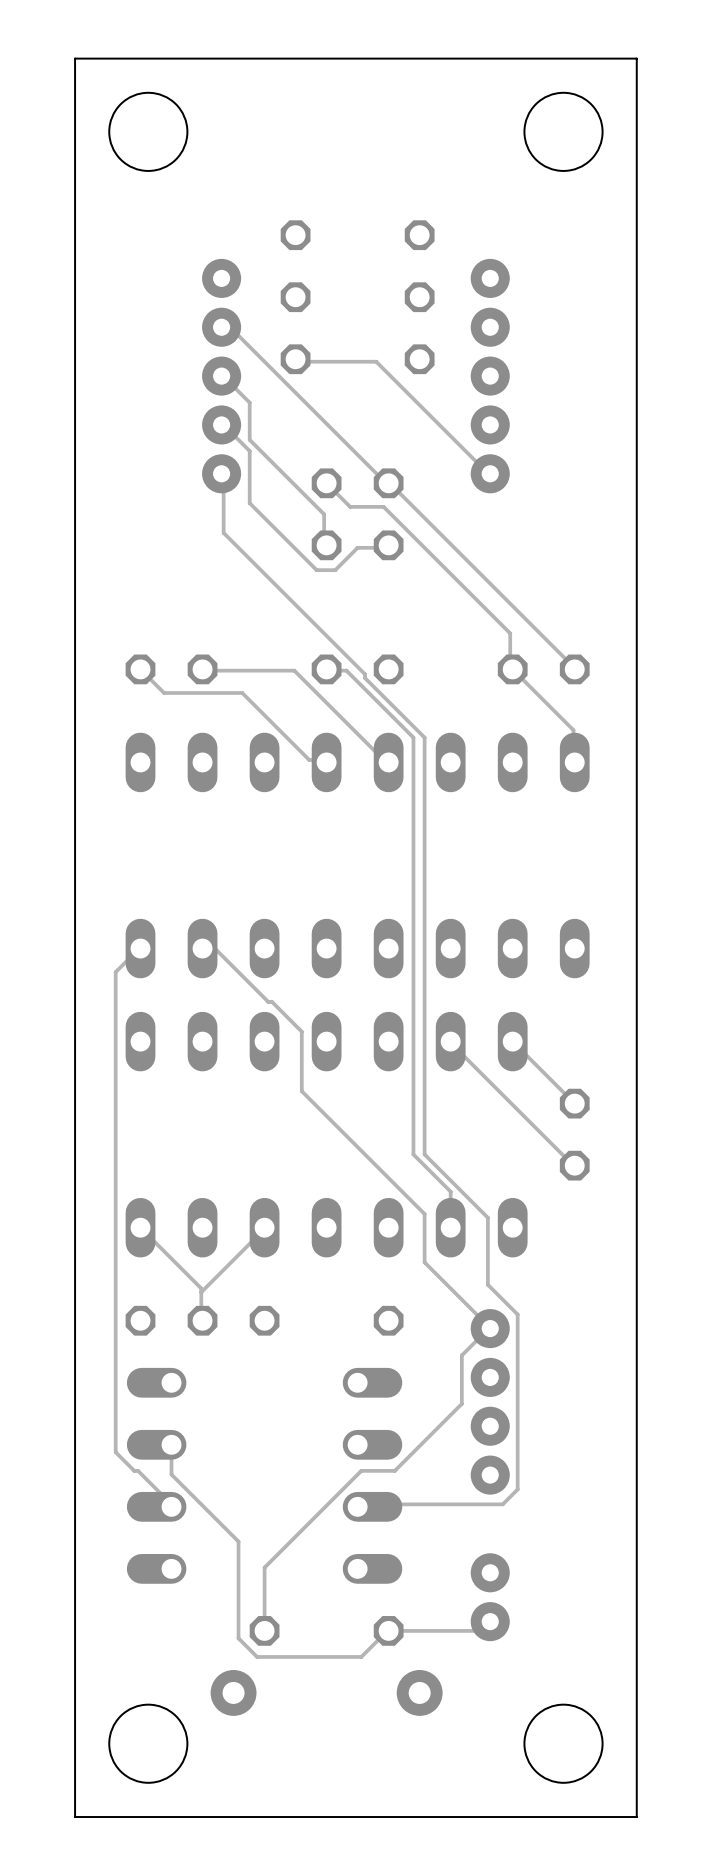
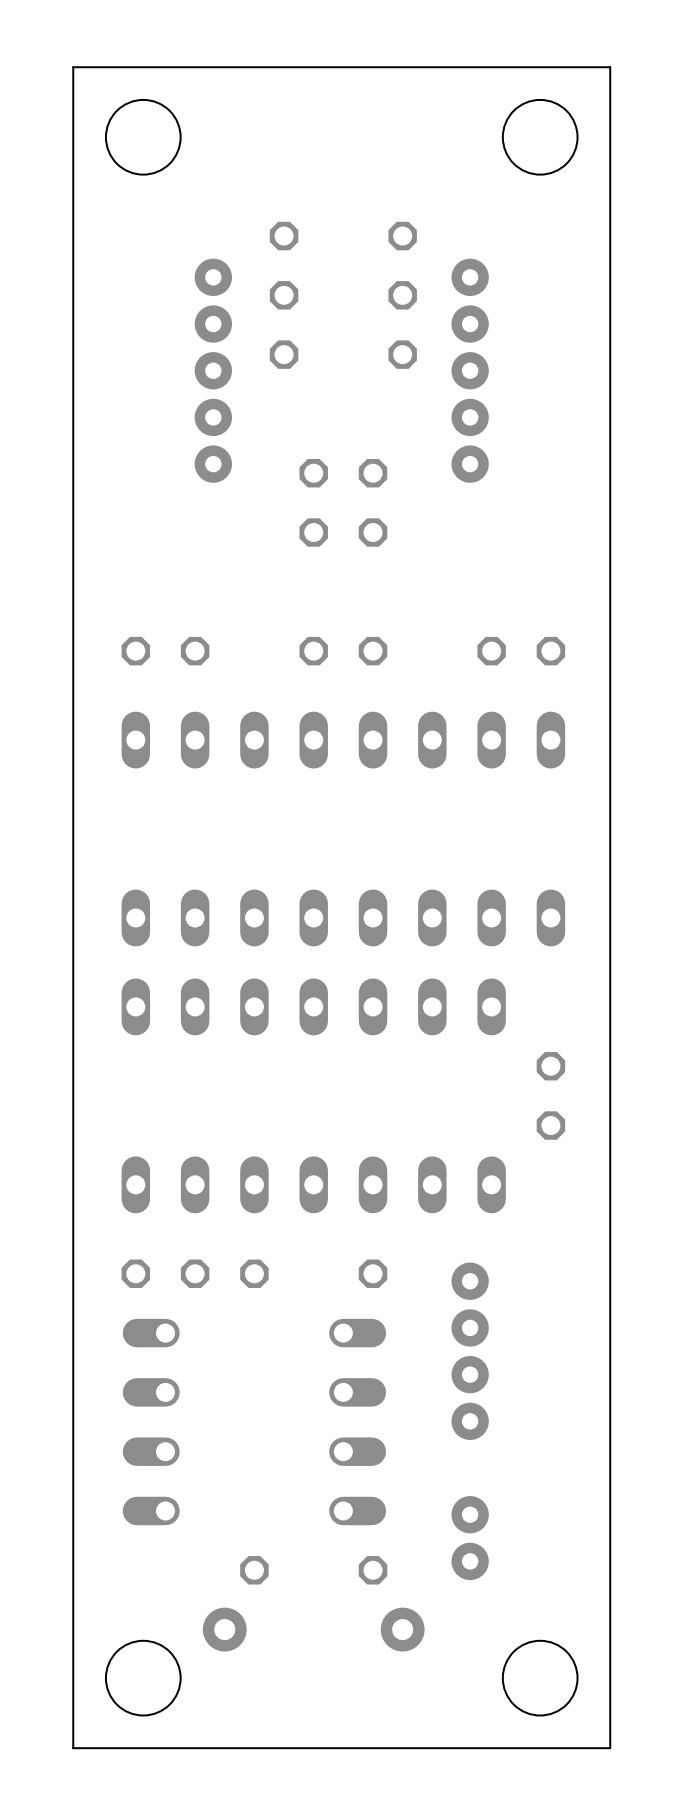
track: (221, 327) (231, 328) (387, 484) (391, 484) (574, 669) -> none
track: (295, 359) (298, 361) (376, 361) (490, 473) -> none
track: (221, 376) (249, 402) (249, 439) (324, 514) (324, 544) (326, 545) -> none
track: (221, 424) (249, 451) (249, 503) (316, 570) (335, 570) (357, 547) (387, 547) (388, 545) -> none
track: (221, 473) (223, 477) (223, 532) (365, 674) (365, 678) (424, 737) (424, 1154) (487, 1217) (487, 1284) (517, 1314) (517, 1489) (502, 1504) (357, 1504) (357, 1506) -> none
track: (326, 483) (350, 506) (383, 506) (510, 633) (510, 666) (573, 730) (574, 762) -> none
track: (140, 669) (164, 692) (242, 692) (309, 759) (324, 759) (326, 762) -> none
track: (202, 669) (294, 670) (387, 763) (388, 762) -> none
track: (326, 669) (346, 670) (413, 737) (413, 1154) (450, 1191) (450, 1227) -> none
track: (140, 948) (115, 972) (115, 1452) (134, 1470) (138, 1470) (171, 1504) (171, 1506) -> none
track: (202, 948) (216, 949) (268, 1001) (272, 1001) (301, 1031) (301, 1091) (424, 1214) (424, 1262) (490, 1328) (461, 1355) (461, 1403) (394, 1470) (361, 1470) (264, 1567) (264, 1630) -> none
track: (450, 1041) (574, 1165) -> none
track: (512, 1041) (574, 1103) -> none
track: (140, 1227) (201, 1288) (202, 1320) -> none
track: (264, 1227) (201, 1292) -> none
track: (171, 1444) (171, 1474) (238, 1541) (238, 1638) (257, 1656) (361, 1656) (387, 1630) (480, 1630) (490, 1621) -> none

